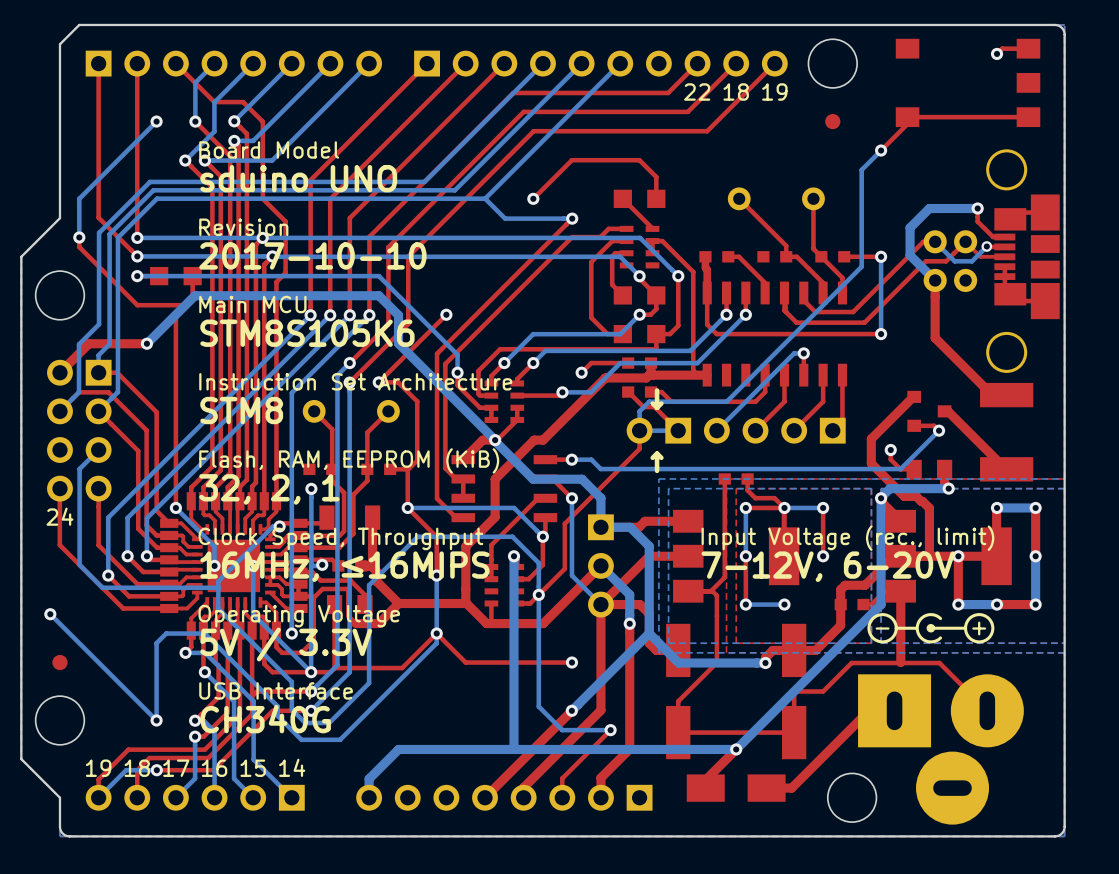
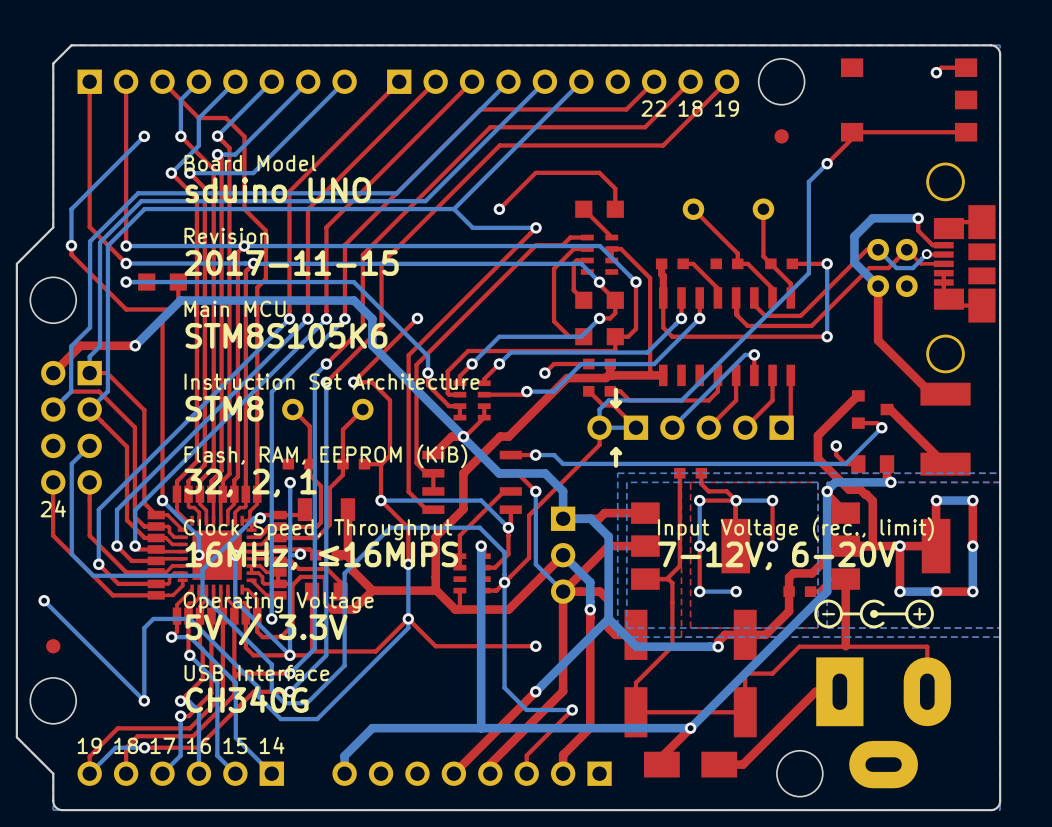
text: 2017-10-10 (312, 255) -> 2017-11-15 (291, 263)
top track: (939, 663) (987, 710) -> (882, 646) (927, 646) (927, 691)
part footprint: [858, 674, 1024, 825] -> [816, 657, 951, 789]

